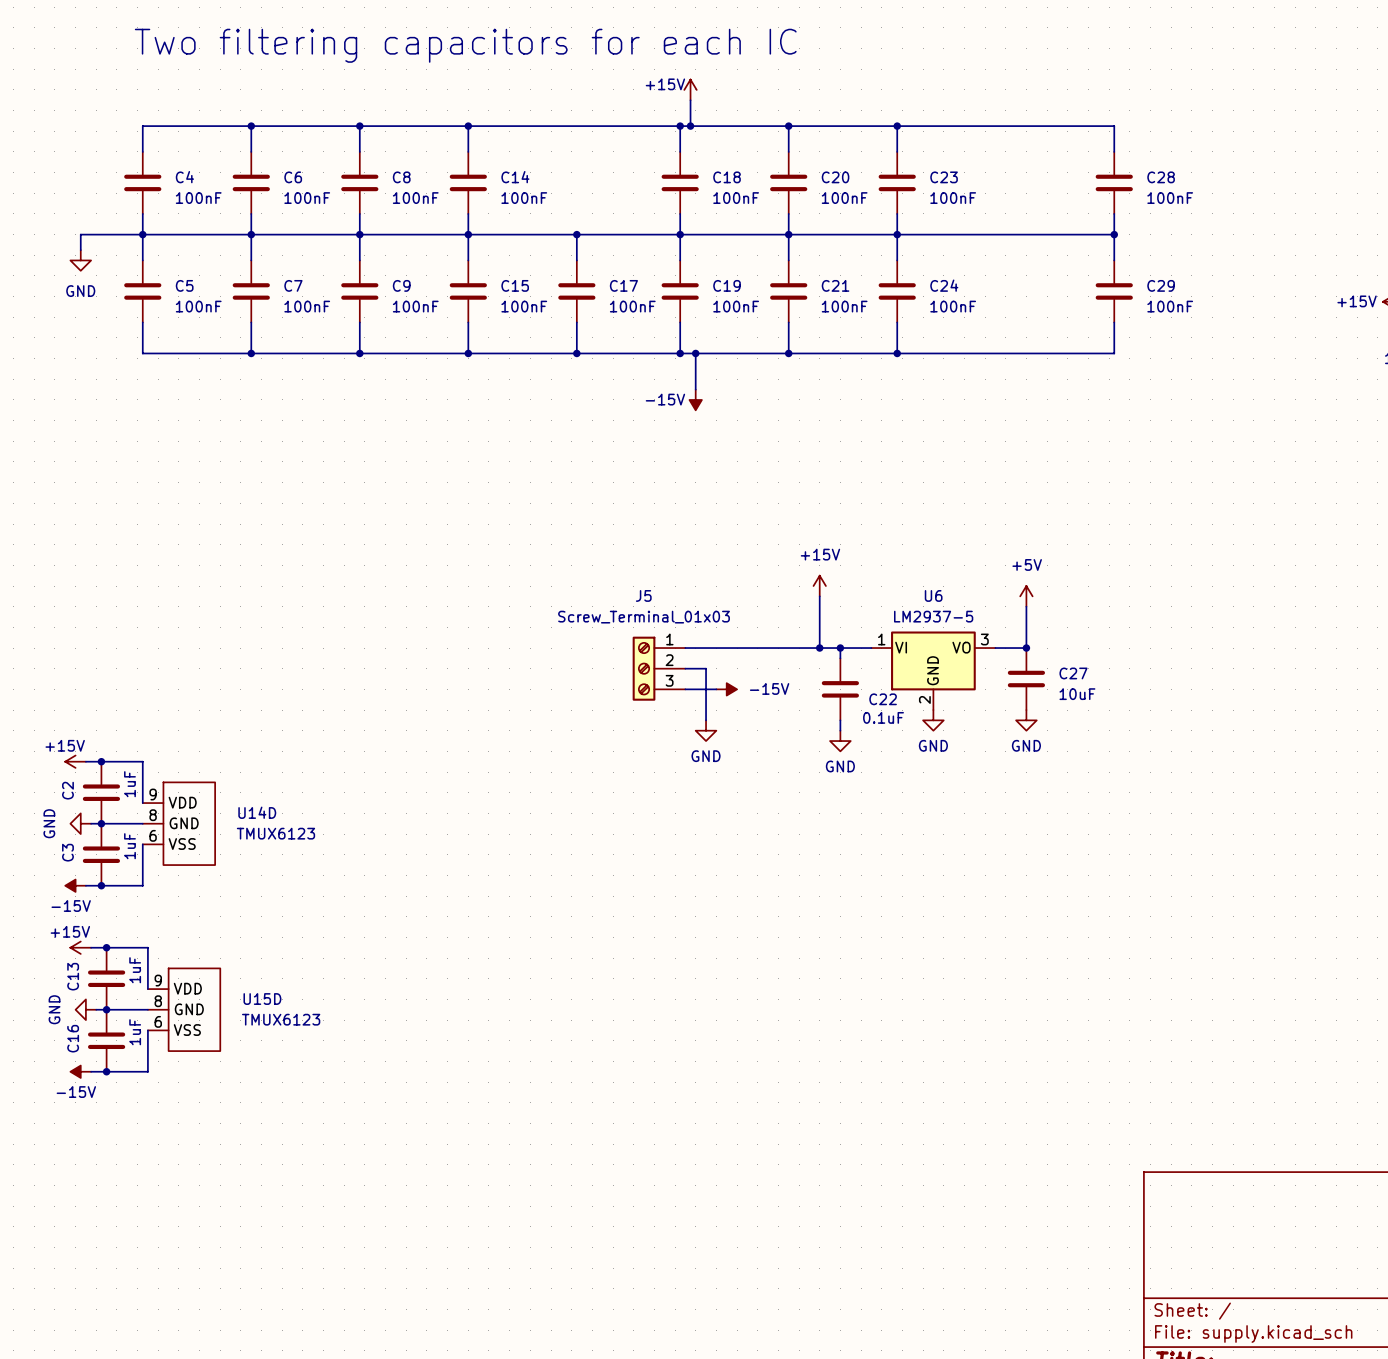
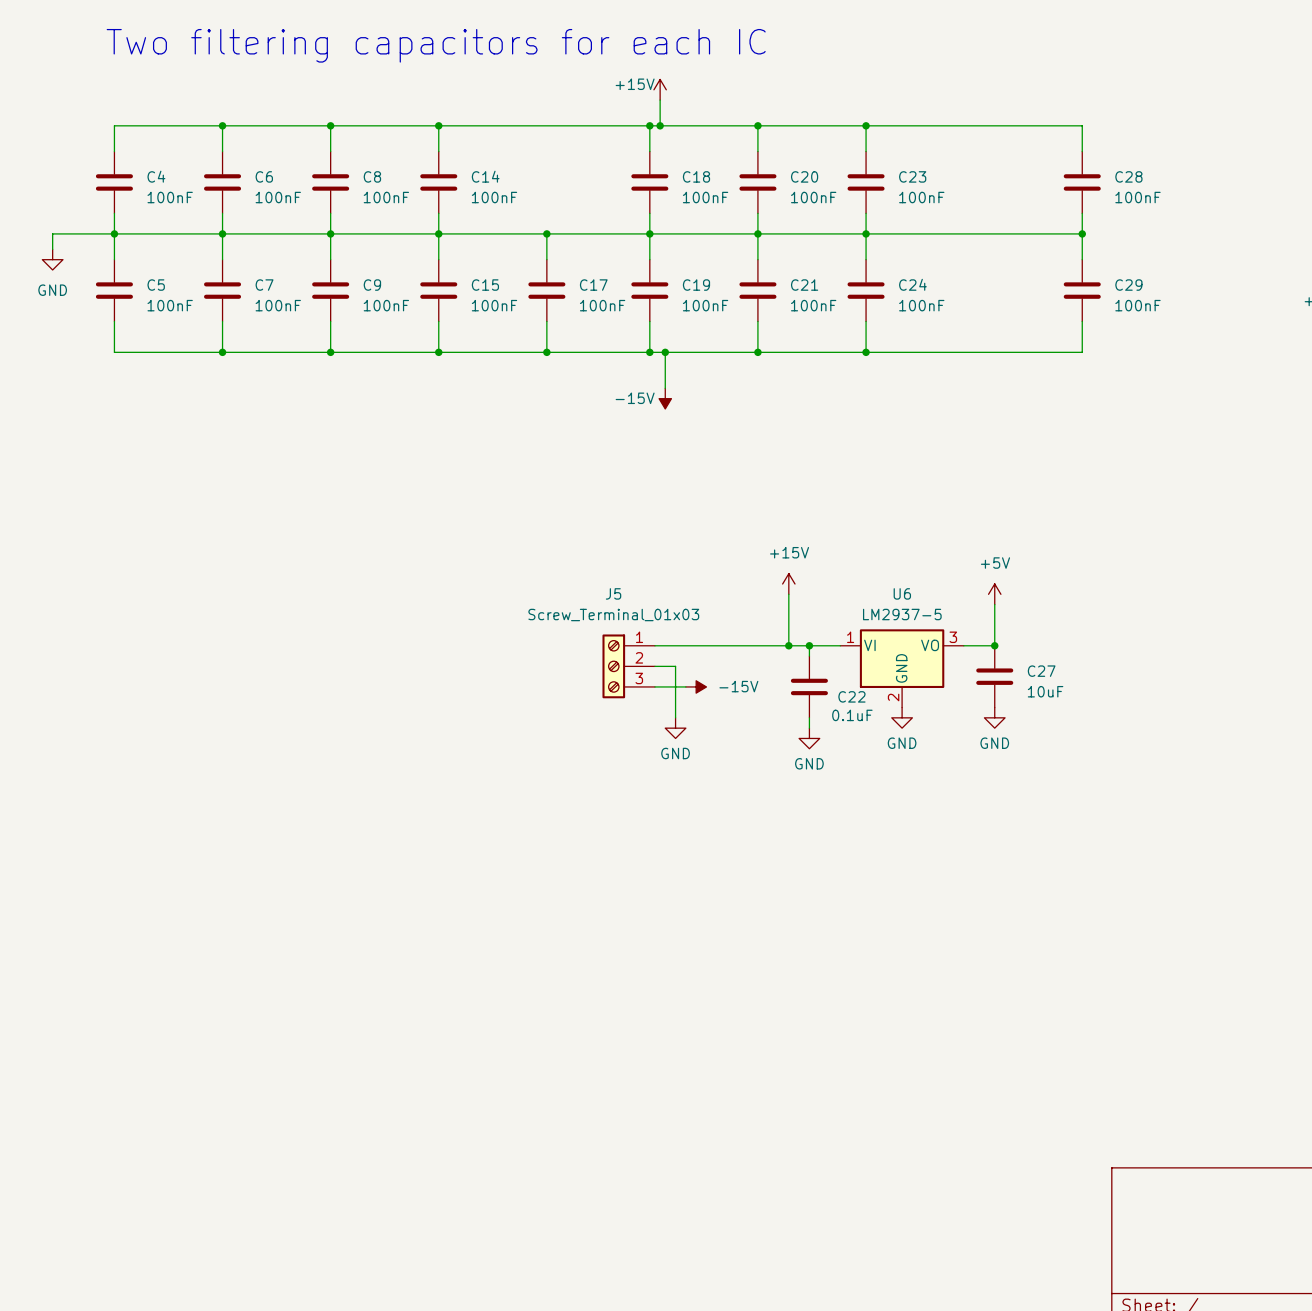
power symbol: +15V (75, 761) -> none
wire: (85, 761) (142, 761) (142, 803) -> none
junction: (101, 761) -> none
C2: 1uF (101, 792) -> none
power symbol: GND (80, 823) -> none
wire: (91, 823) (142, 823) -> none
junction: (101, 823) -> none
U14D: TMUX6123 (178, 823) -> none
wire: (142, 844) (142, 885) (85, 885) -> none
C3: 1uF (101, 854) -> none
power symbol: -15V (75, 885) -> none
junction: (101, 885) -> none
power symbol: +15V (80, 947) -> none
wire: (91, 947) (147, 947) (147, 989) -> none
junction: (106, 947) -> none
C13: 1uF (106, 978) -> none
power symbol: GND (85, 1009) -> none
wire: (96, 1009) (147, 1009) -> none
junction: (106, 1009) -> none
U15D: TMUX6123 (184, 1009) -> none
wire: (147, 1030) (147, 1071) (91, 1071) -> none
C16: 1uF (106, 1040) -> none
power symbol: -15V (80, 1071) -> none
junction: (106, 1071) -> none

